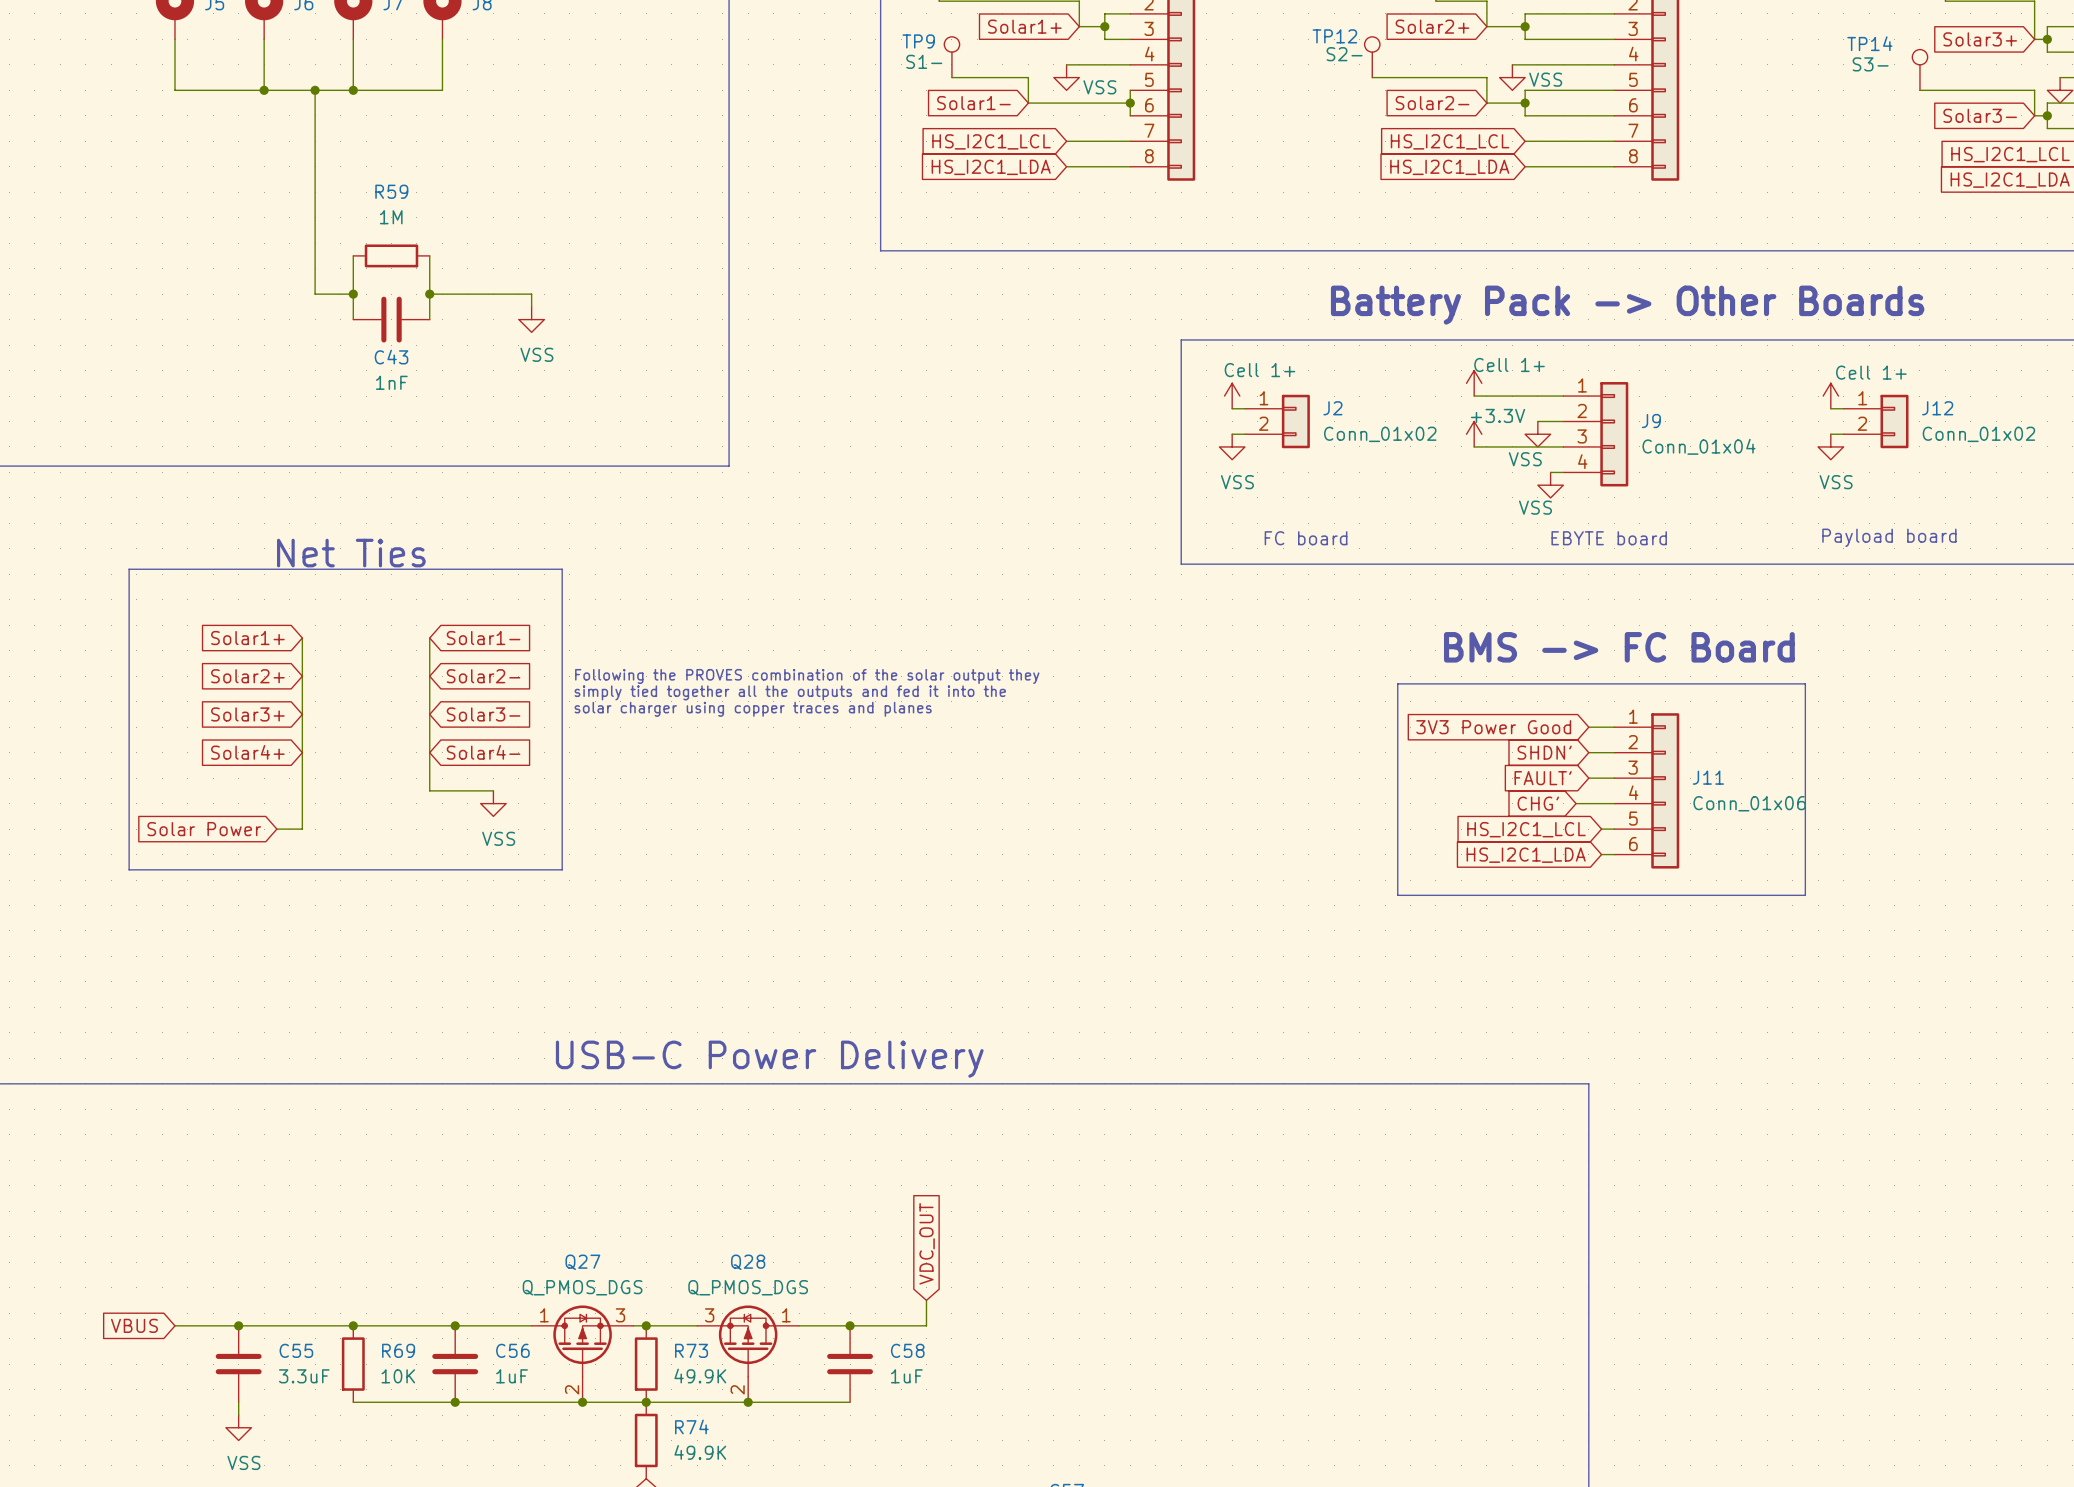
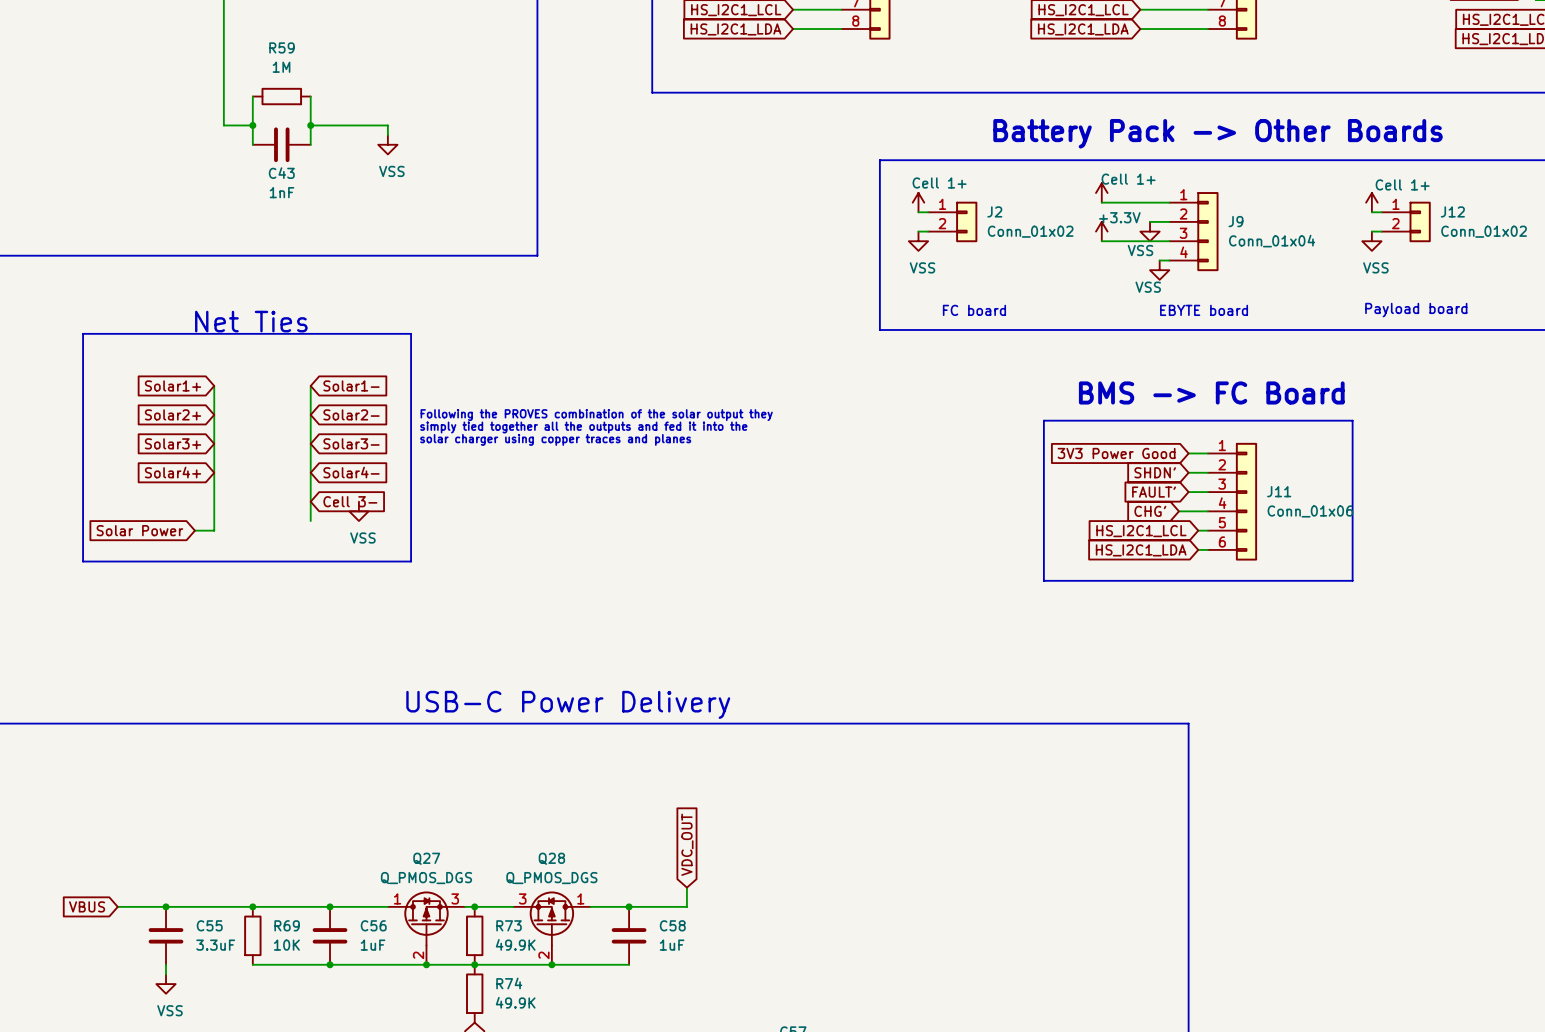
wire: (429, 790) (493, 790) -> (310, 501) (310, 521)
global label: none -> Cell 3- (350, 501)

